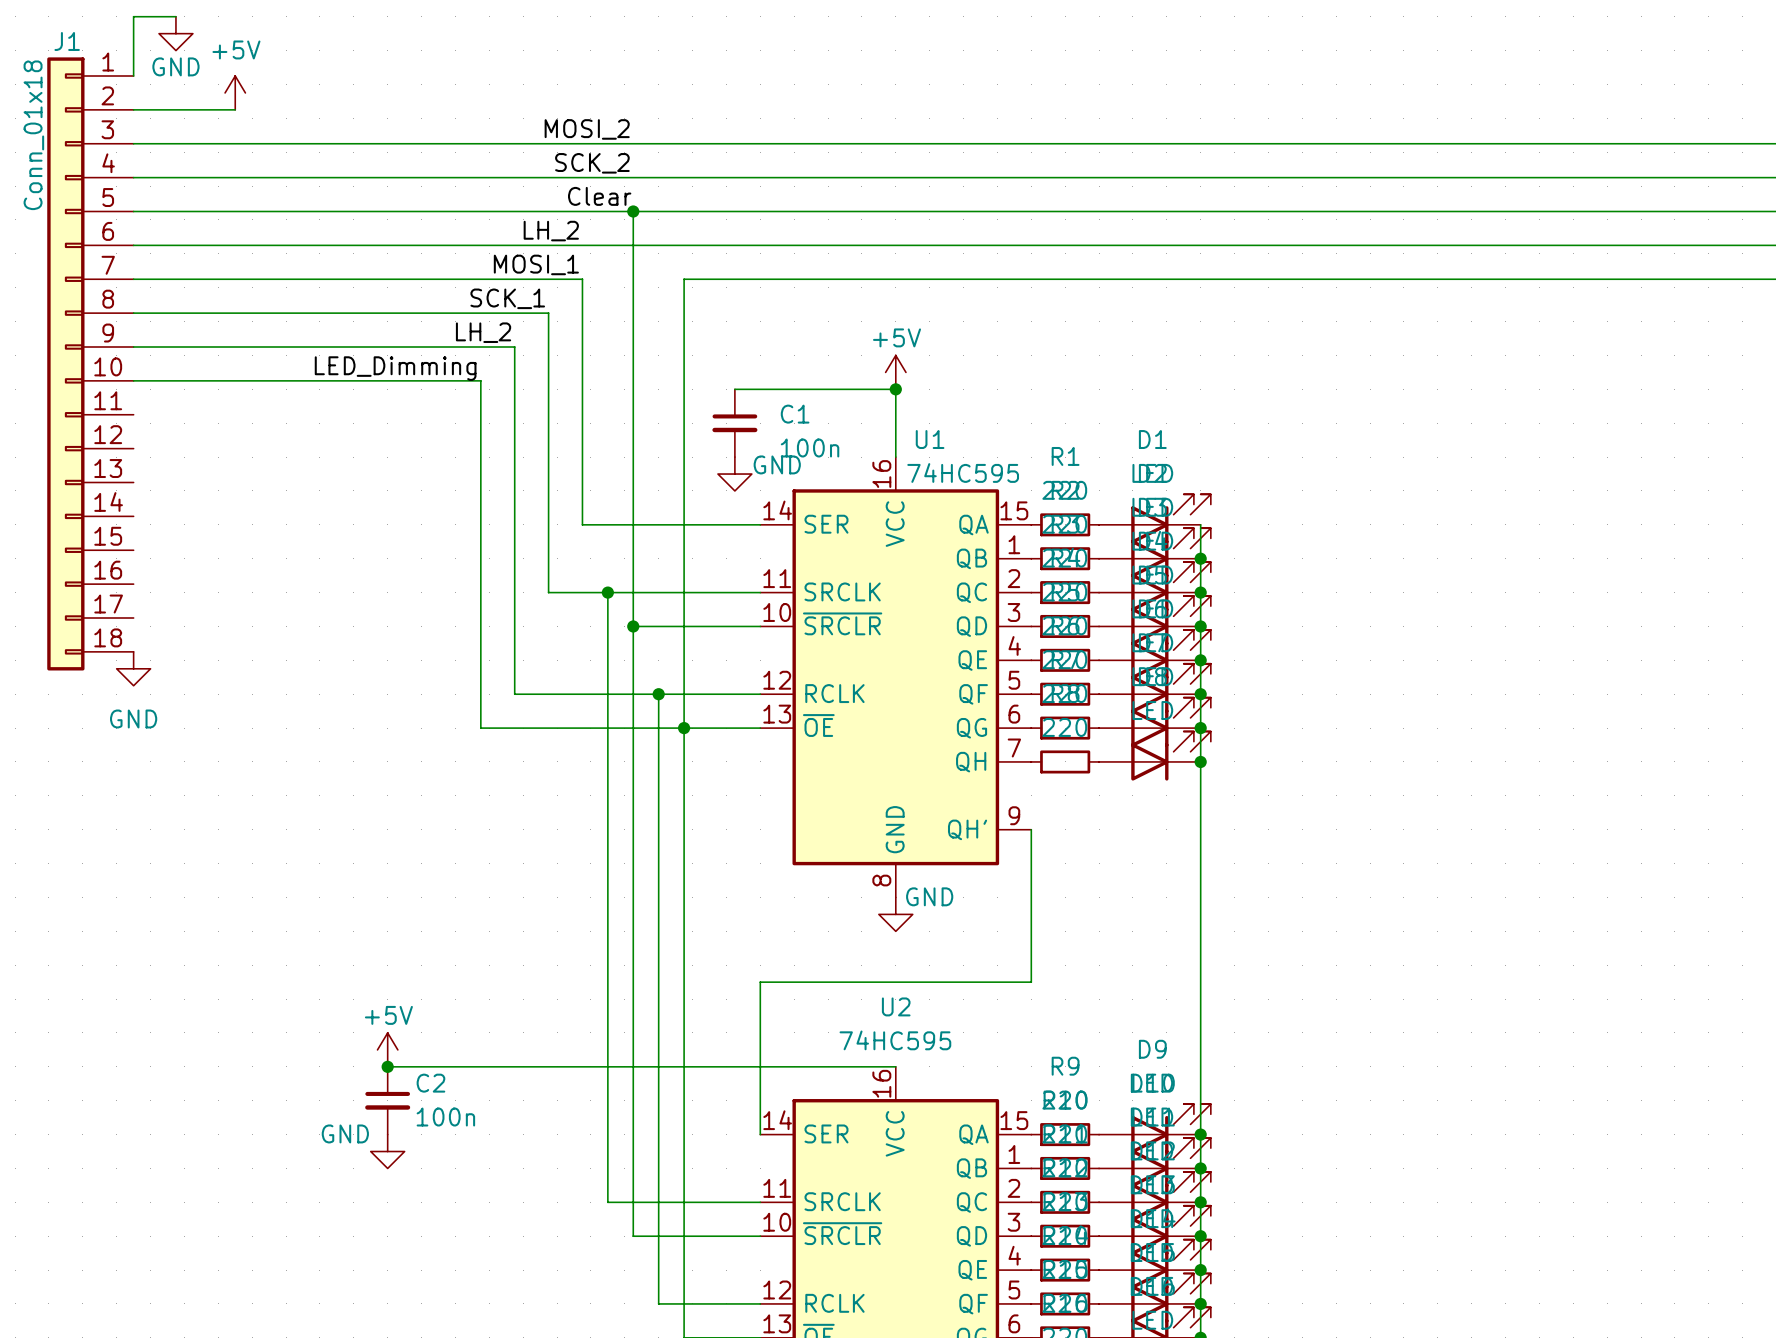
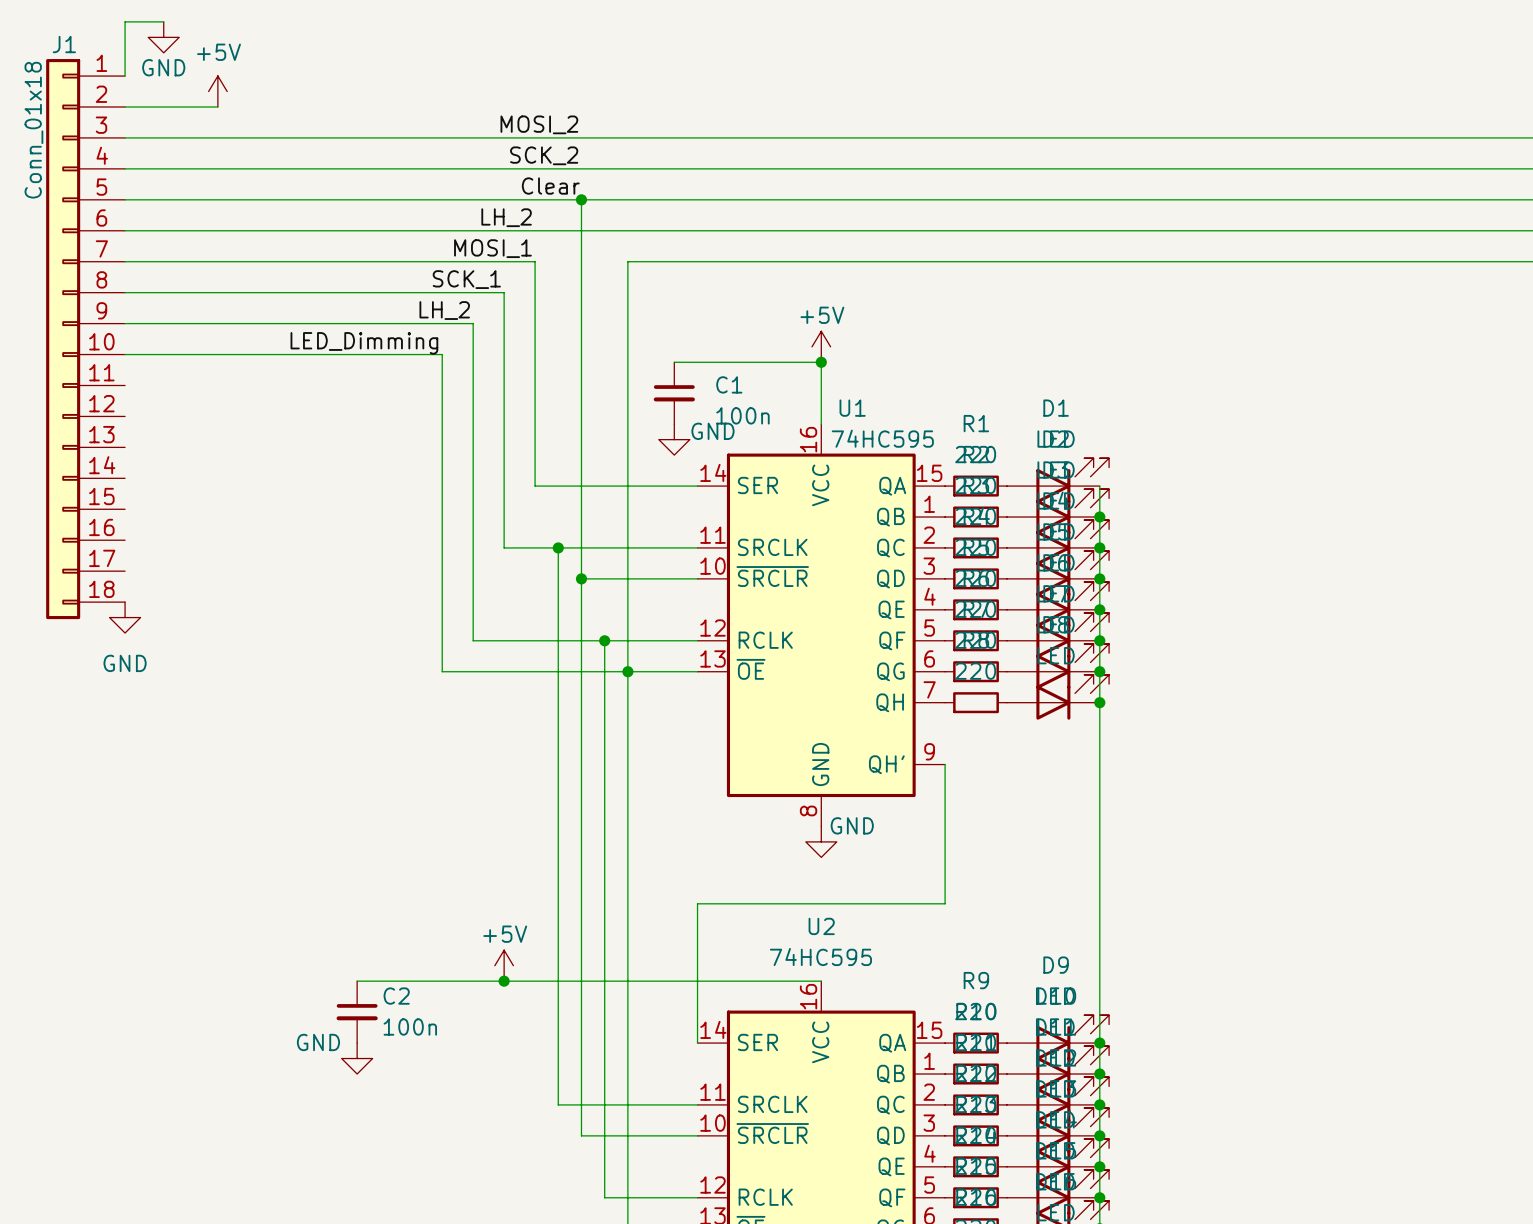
power symbol position: +5V (387, 1049) -> +5V (504, 965)
junction: (387, 1066) -> none
junction: none -> (504, 981)

